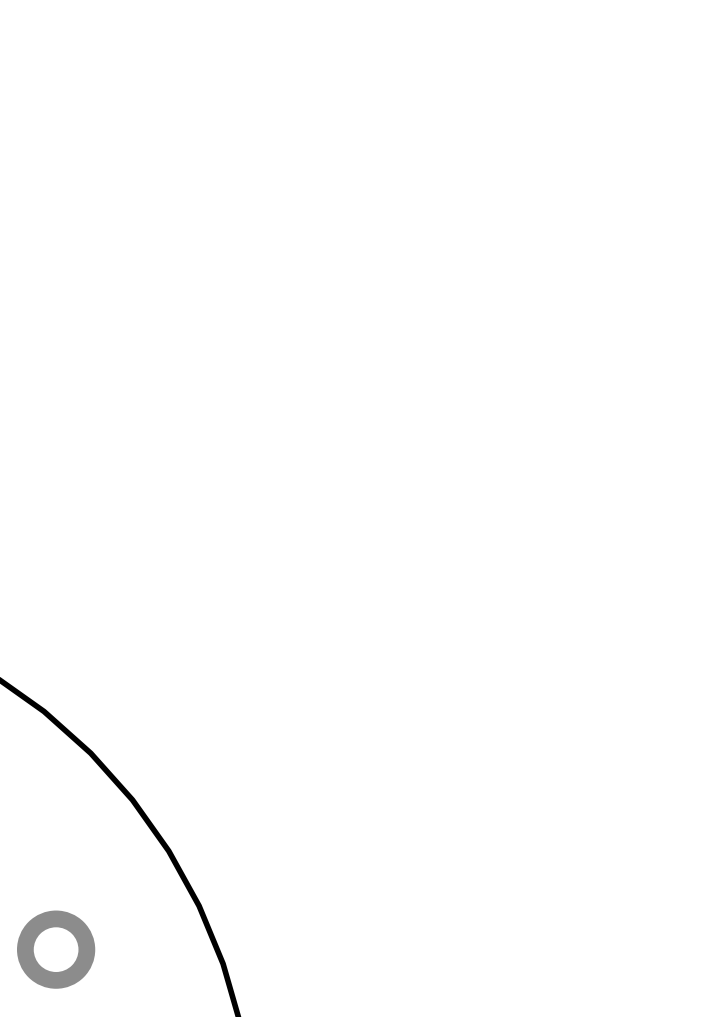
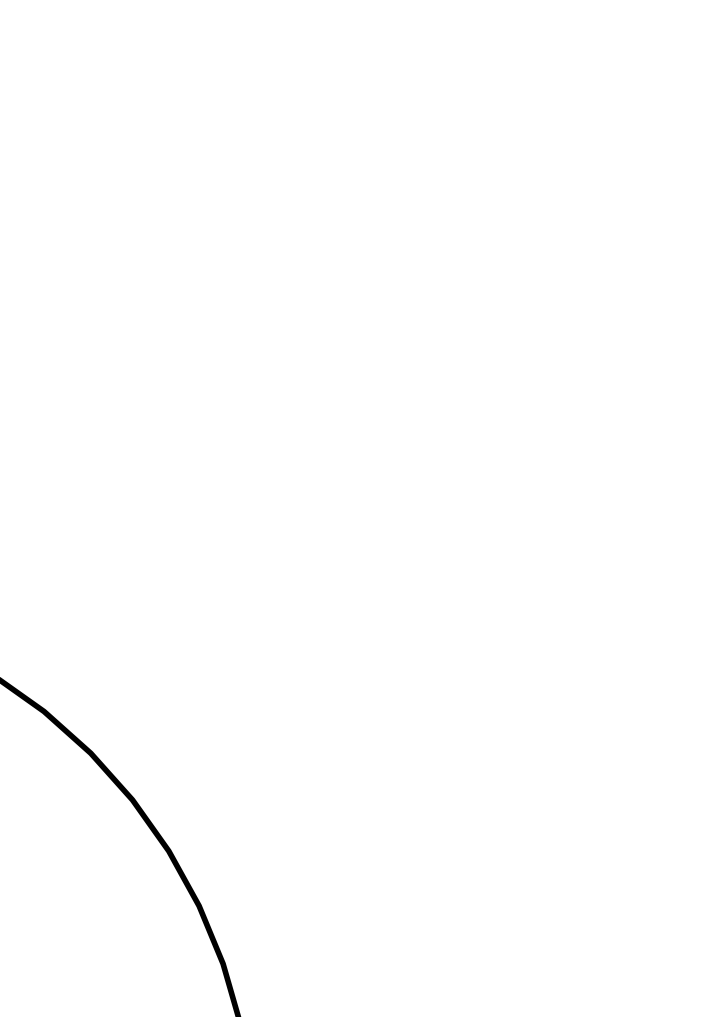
via: (56, 949) -> none

